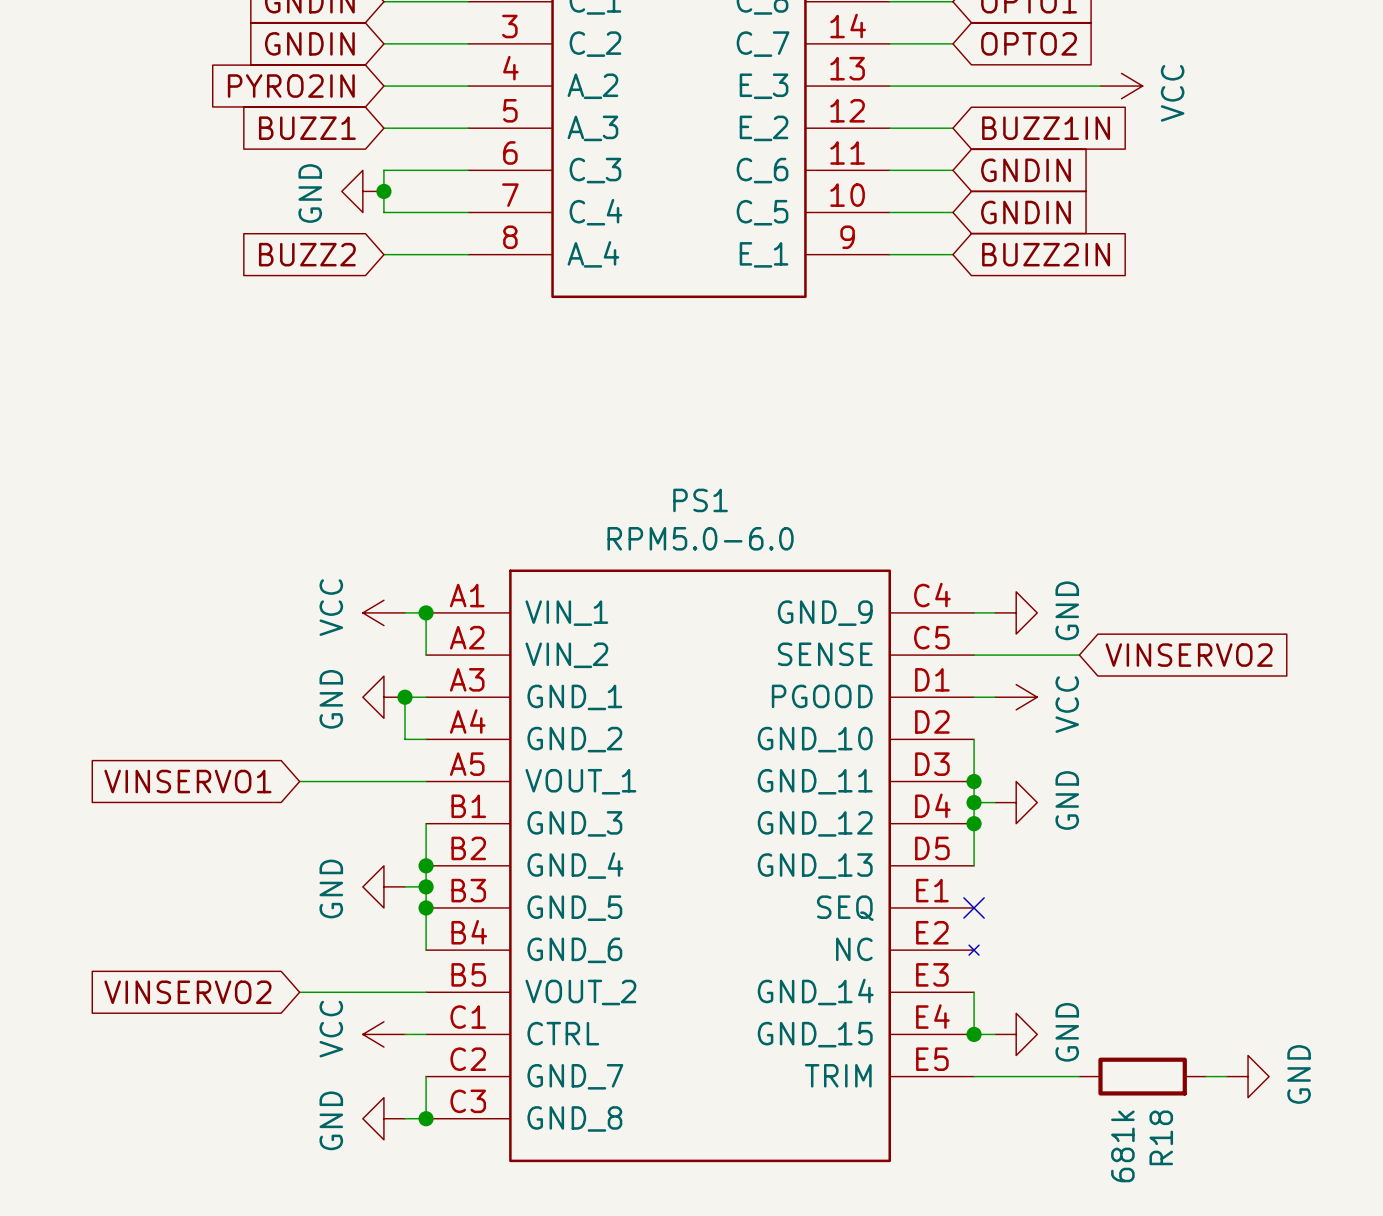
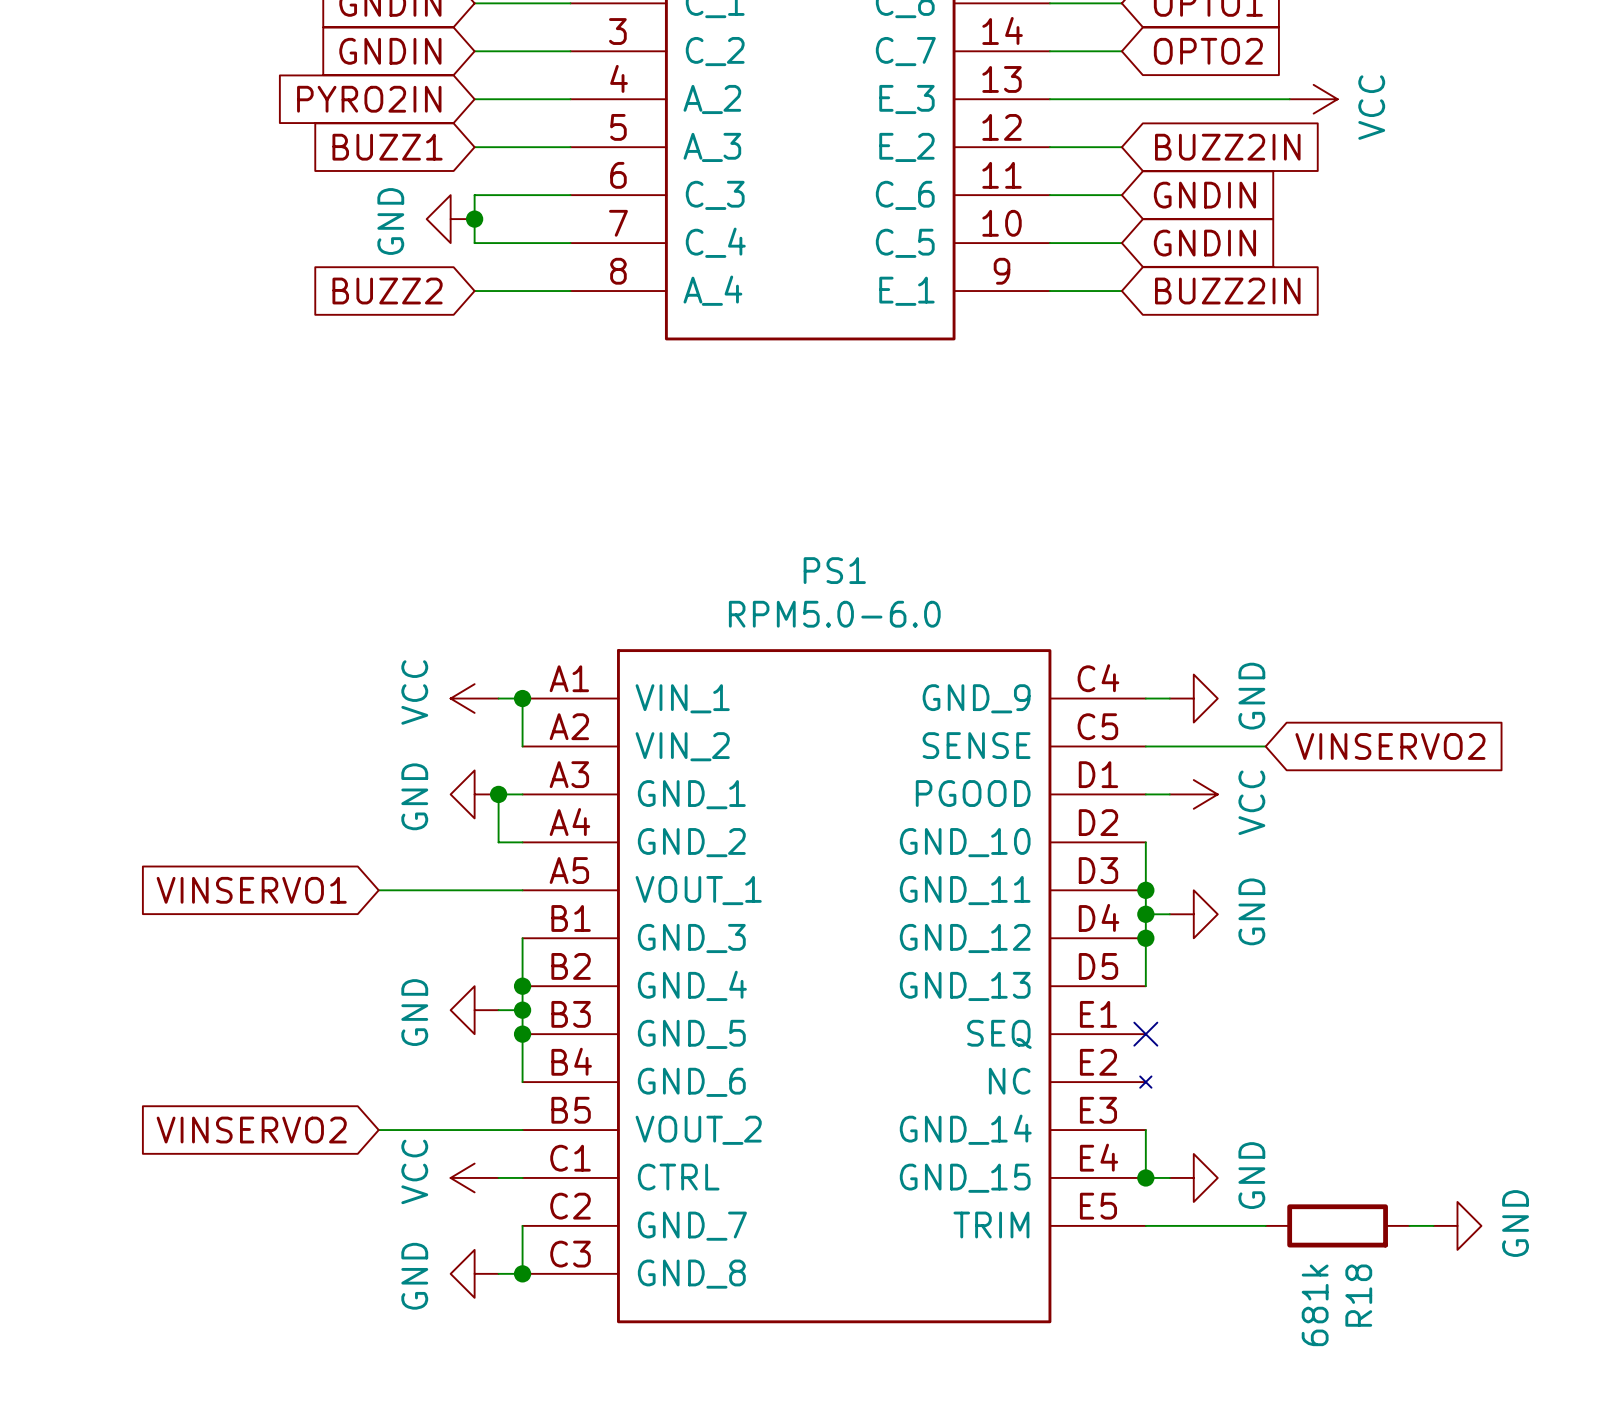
global label: BUZZ1IN (1046, 128) -> BUZZ2IN (1227, 147)

